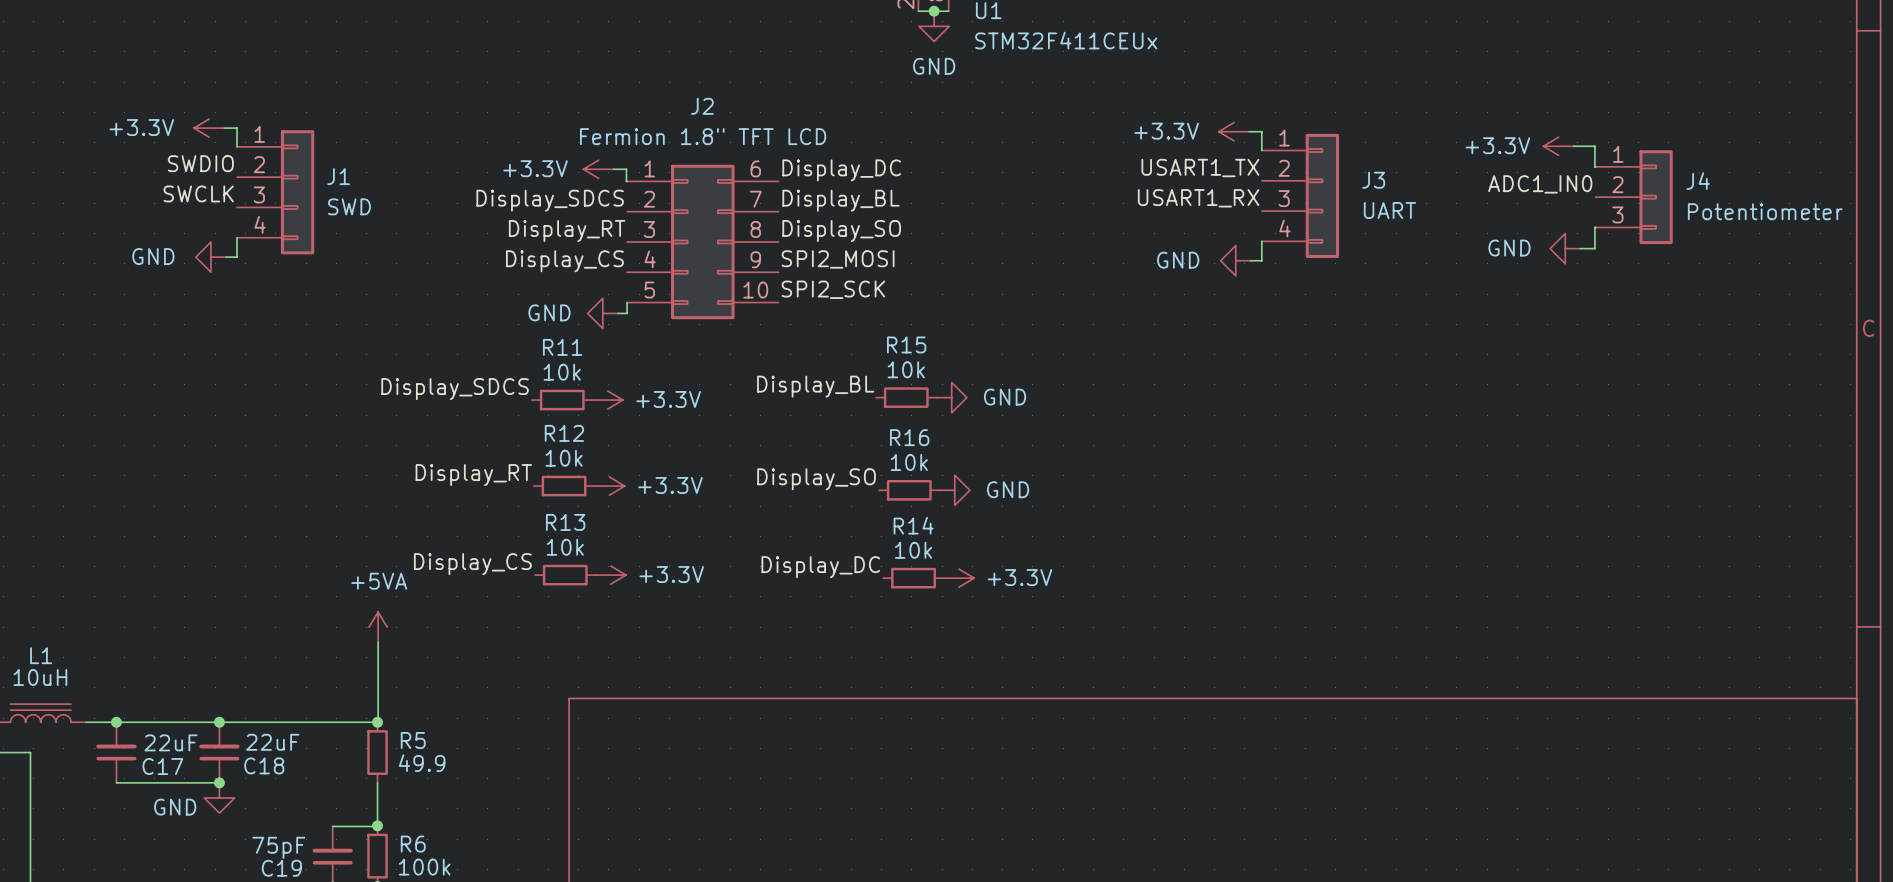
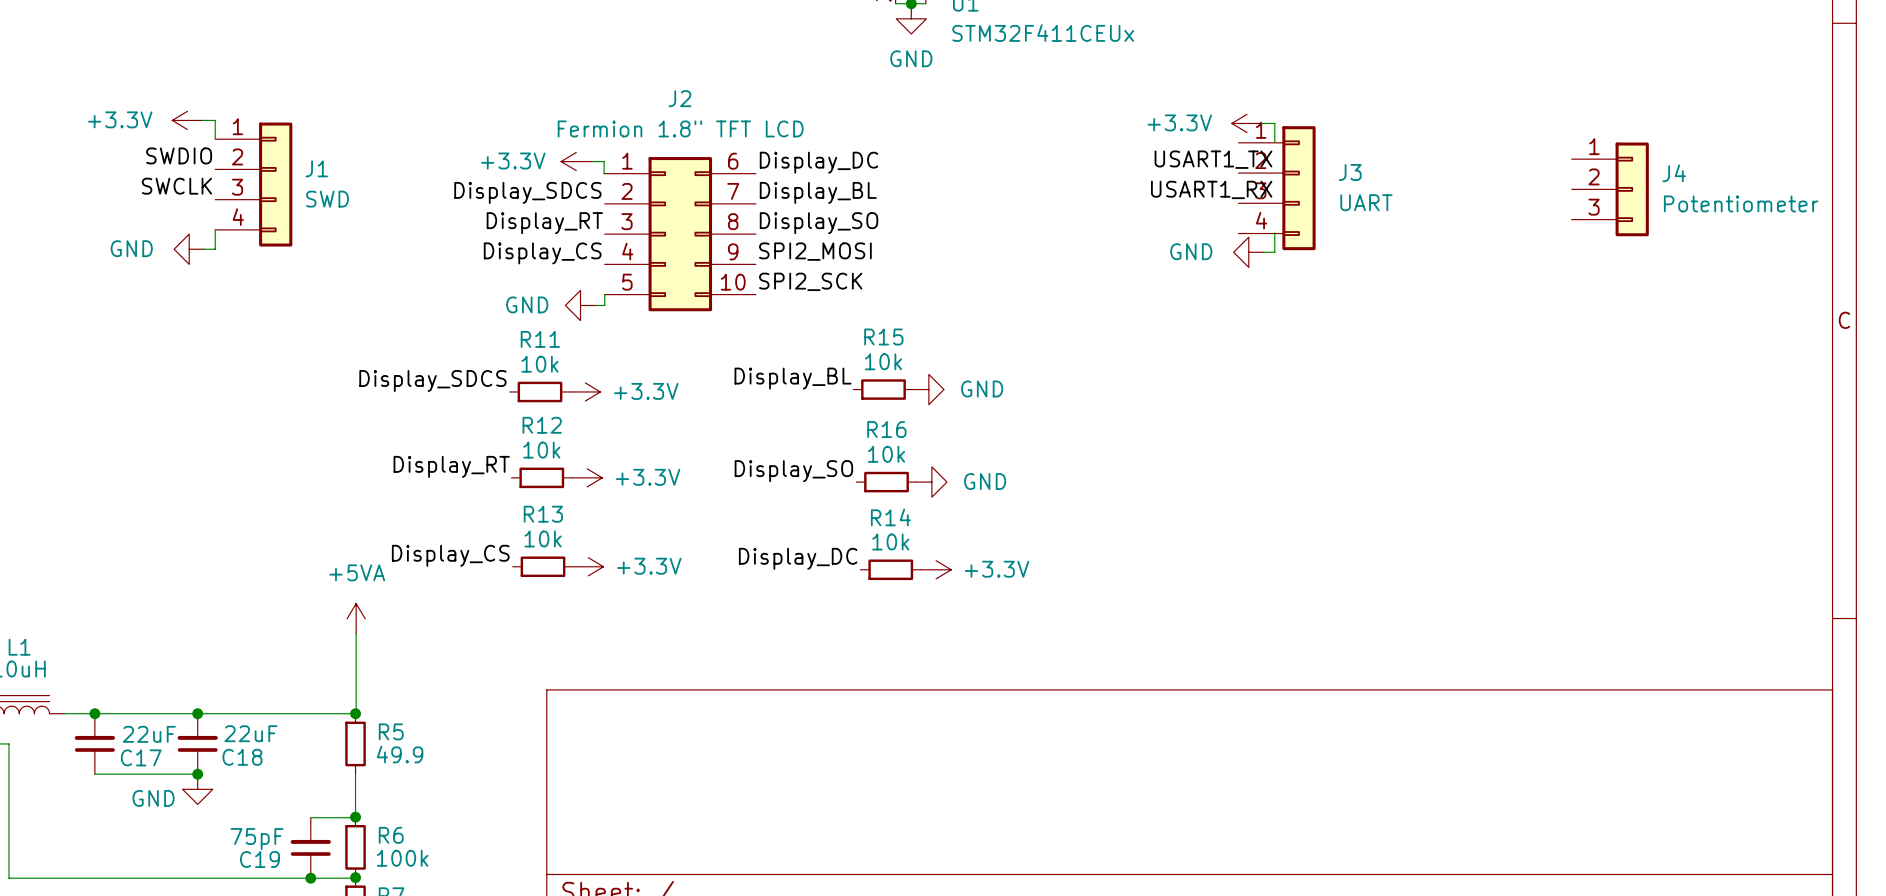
power symbol position: +3.3V (1233, 131) -> +3.3V (1246, 123)
wire: (1249, 131) (1261, 131) (1261, 150) -> (1262, 123) (1274, 123) (1274, 142)
power symbol: +3.3V (1558, 146) -> none
wire: (1573, 146) (1594, 146) (1595, 166) -> none
label position: USART1_TX (1200, 168) -> USART1_TX (1213, 159)
label: ADC1_IN0 (1540, 184) -> none
label position: USART1_RX (1198, 198) -> USART1_RX (1211, 189)
wire: (1595, 227) (1594, 248) (1580, 248) -> none
wire: (1261, 241) (1261, 260) (1250, 260) -> (1274, 232) (1274, 252) (1263, 252)
power symbol: GND (1565, 248) -> none
power symbol position: GND (1235, 260) -> GND (1248, 252)

